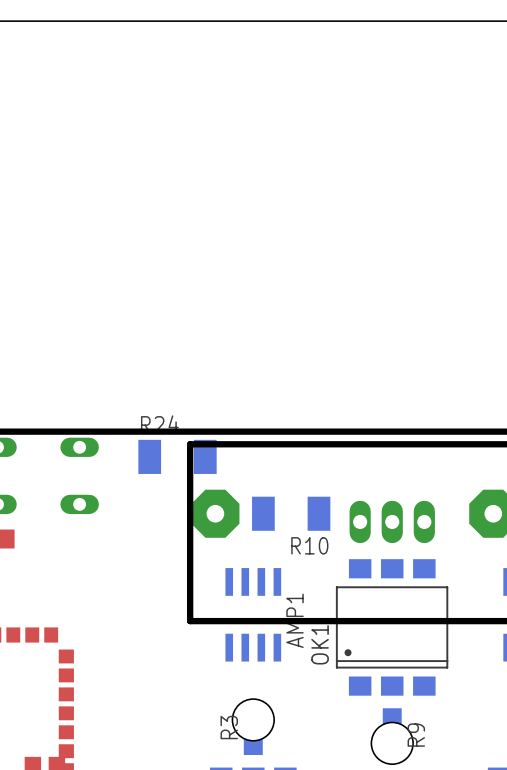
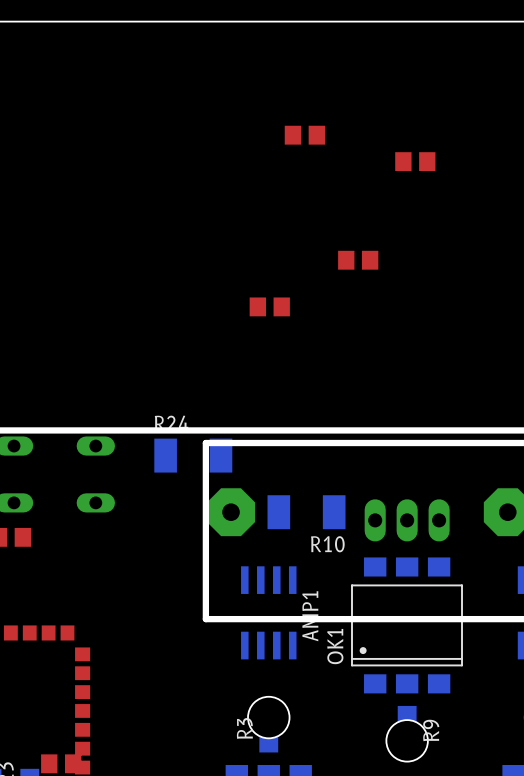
part: none -> (304, 135)
part: none -> (415, 161)
part: none -> (358, 260)
part: none -> (269, 306)

